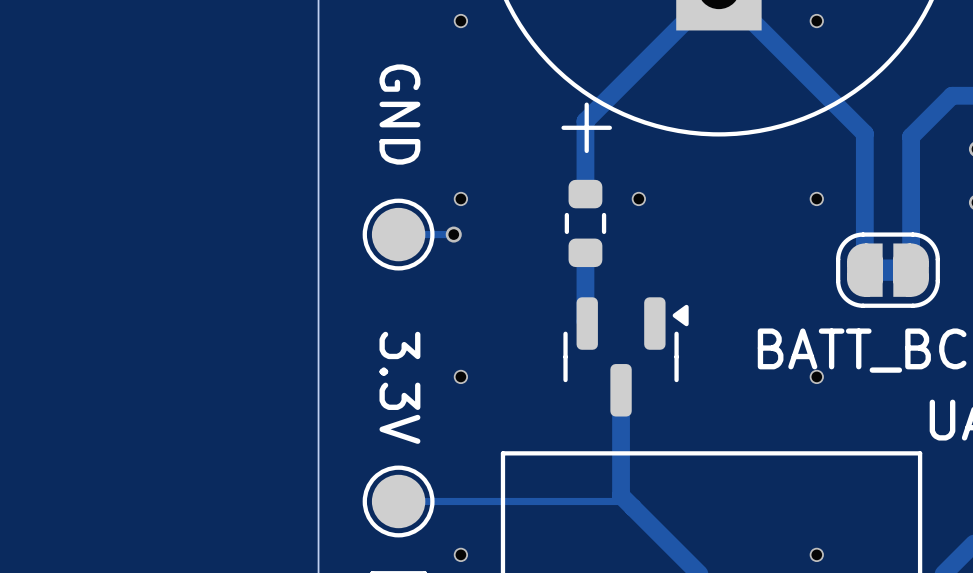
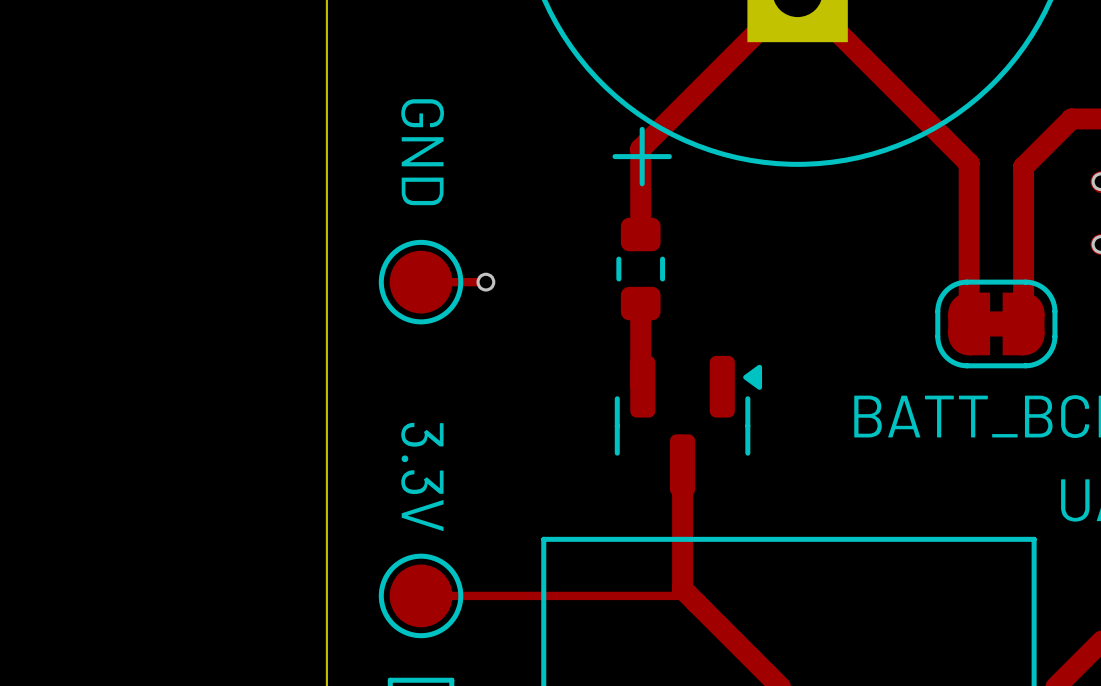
via: (460, 21) -> none
via: (816, 21) -> none
via: (460, 198) -> none
via: (638, 198) -> none
via: (816, 198) -> none
via: (460, 376) -> none
via: (816, 376) -> none
via: (460, 554) -> none
via: (816, 554) -> none

